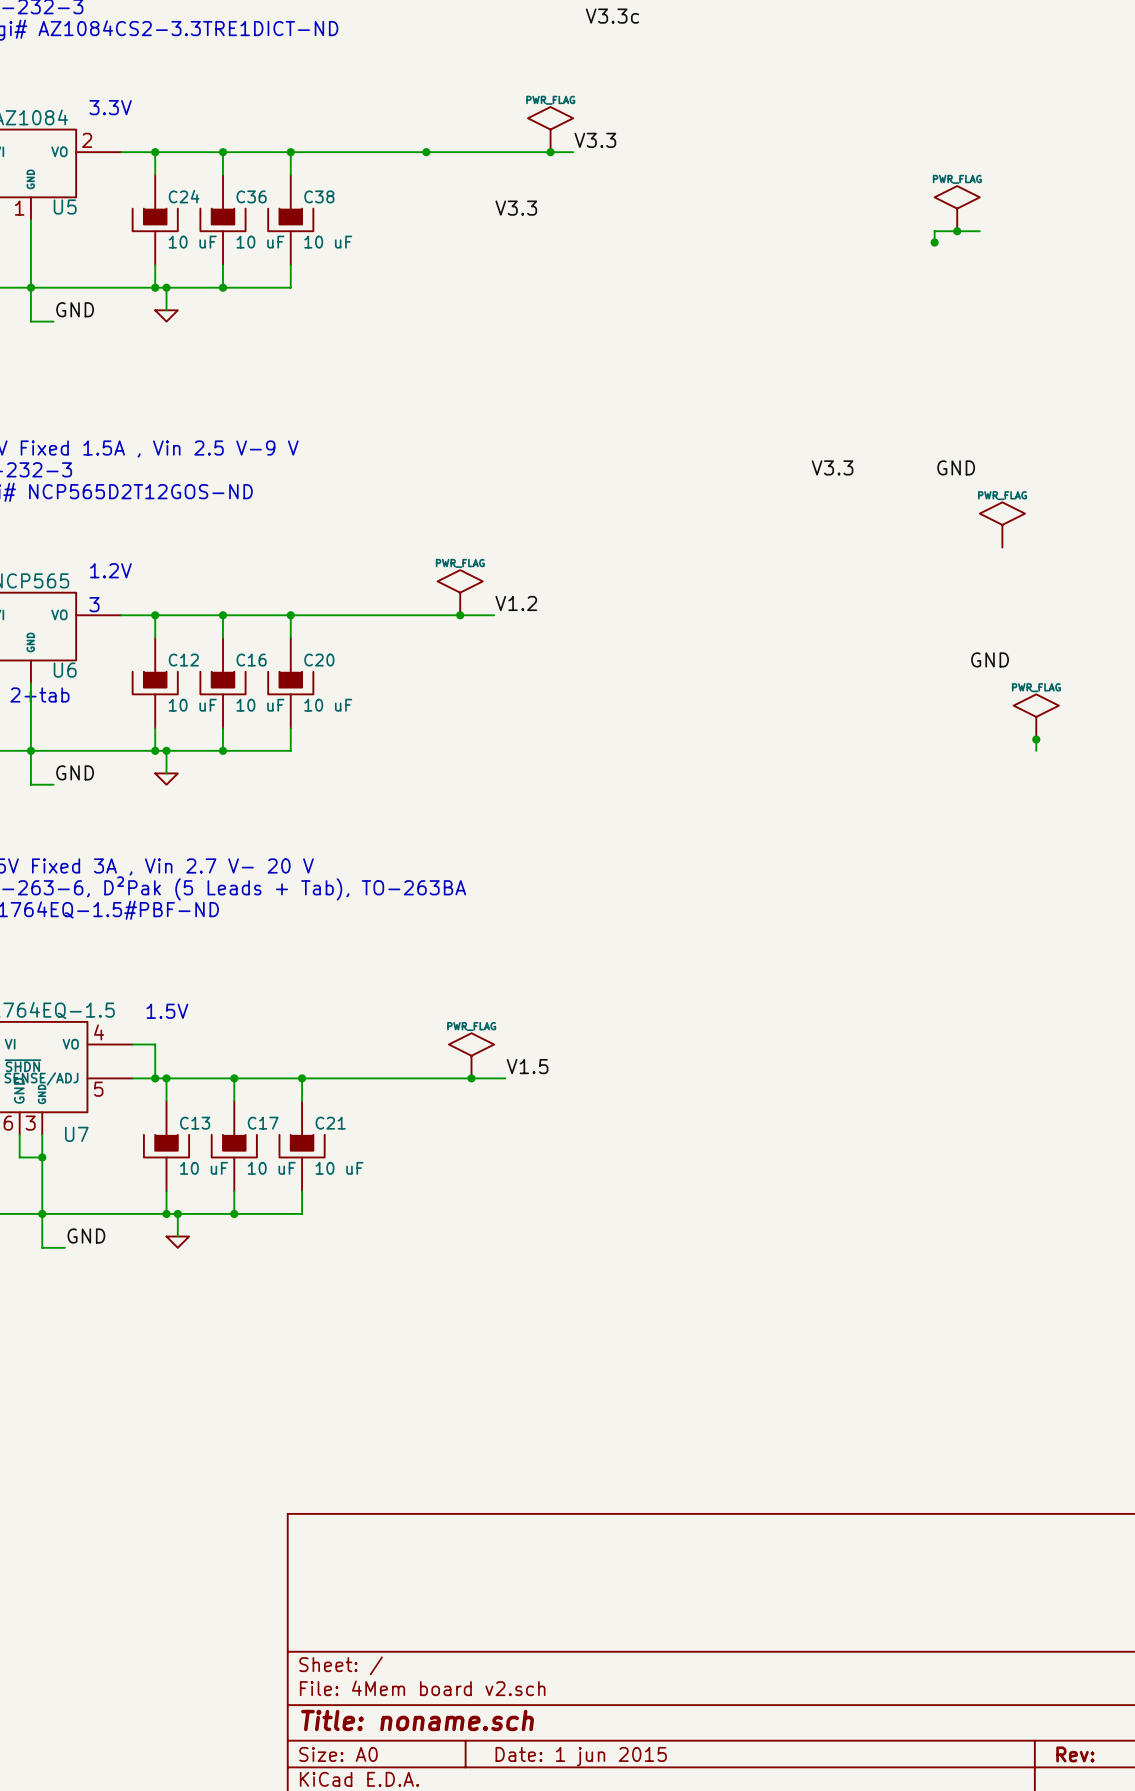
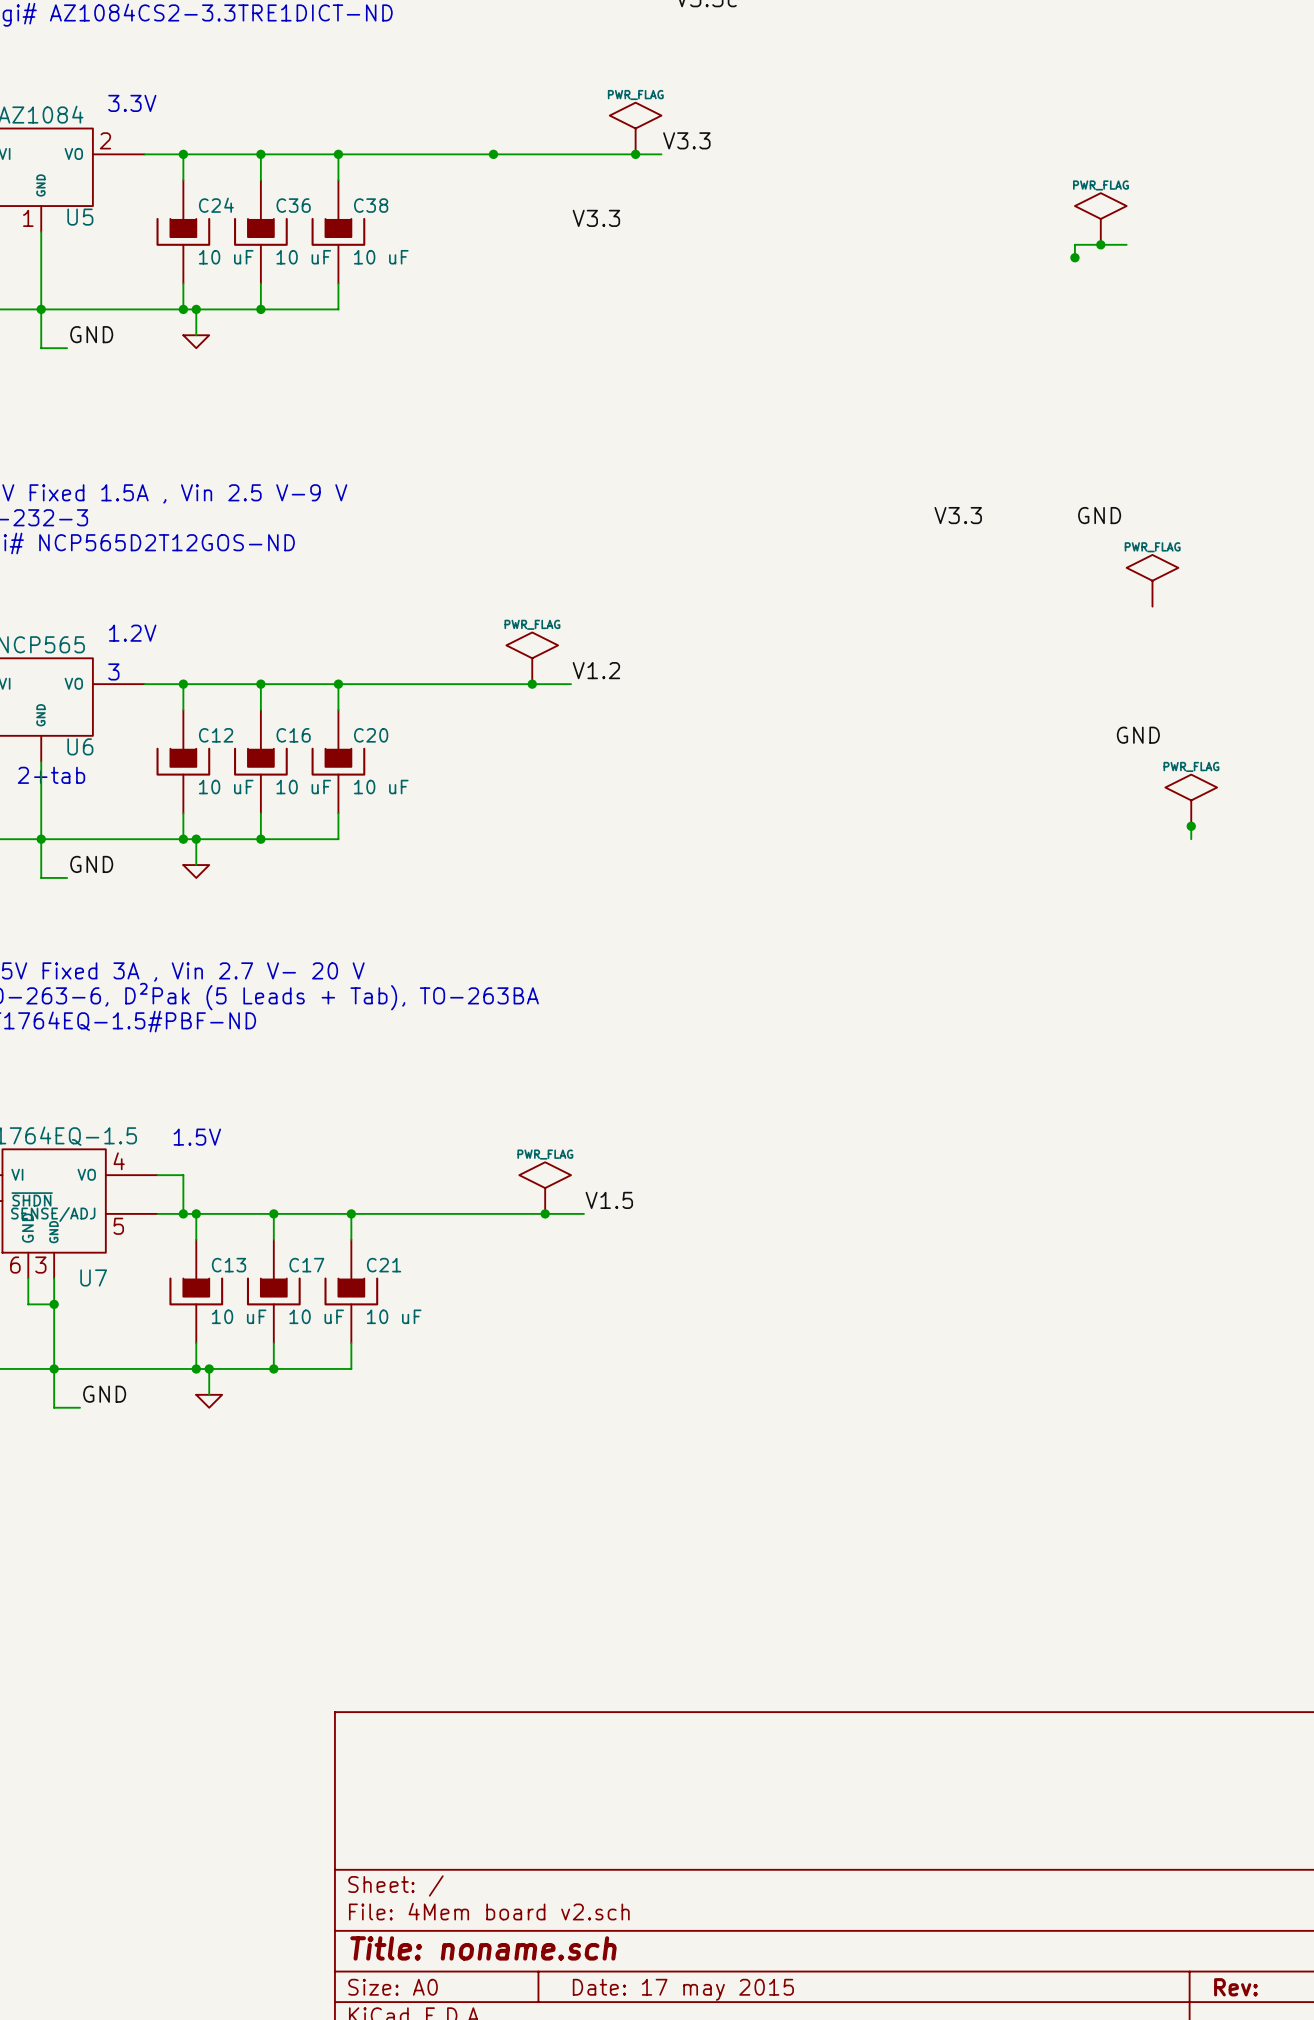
title block: Date: 1 jun 2015 (581, 1756) -> Date: 17 may 2015 (683, 1989)

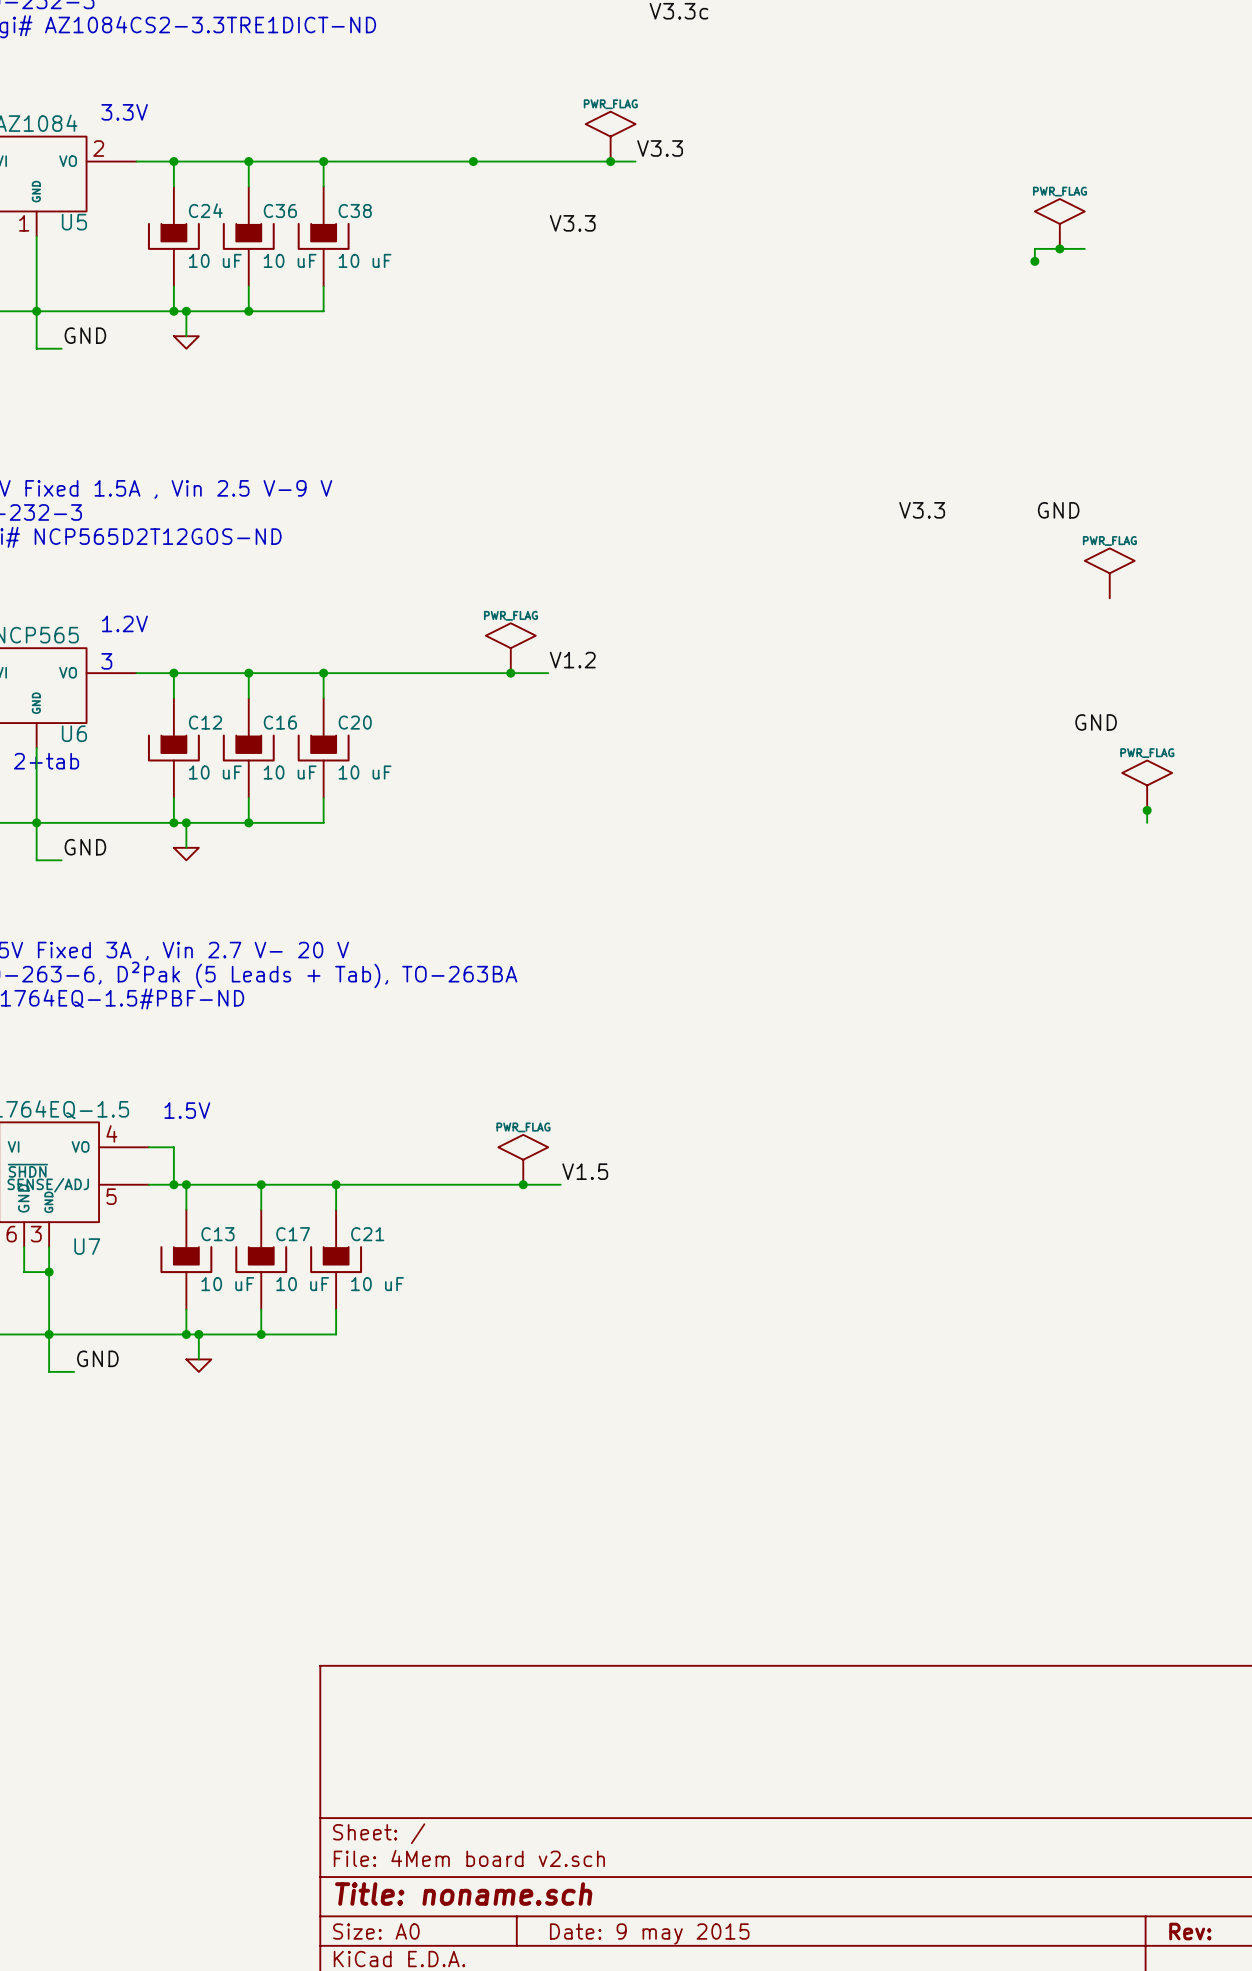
title block: Date: 17 may 2015 (683, 1989) -> Date: 9 may 2015 (649, 1933)

